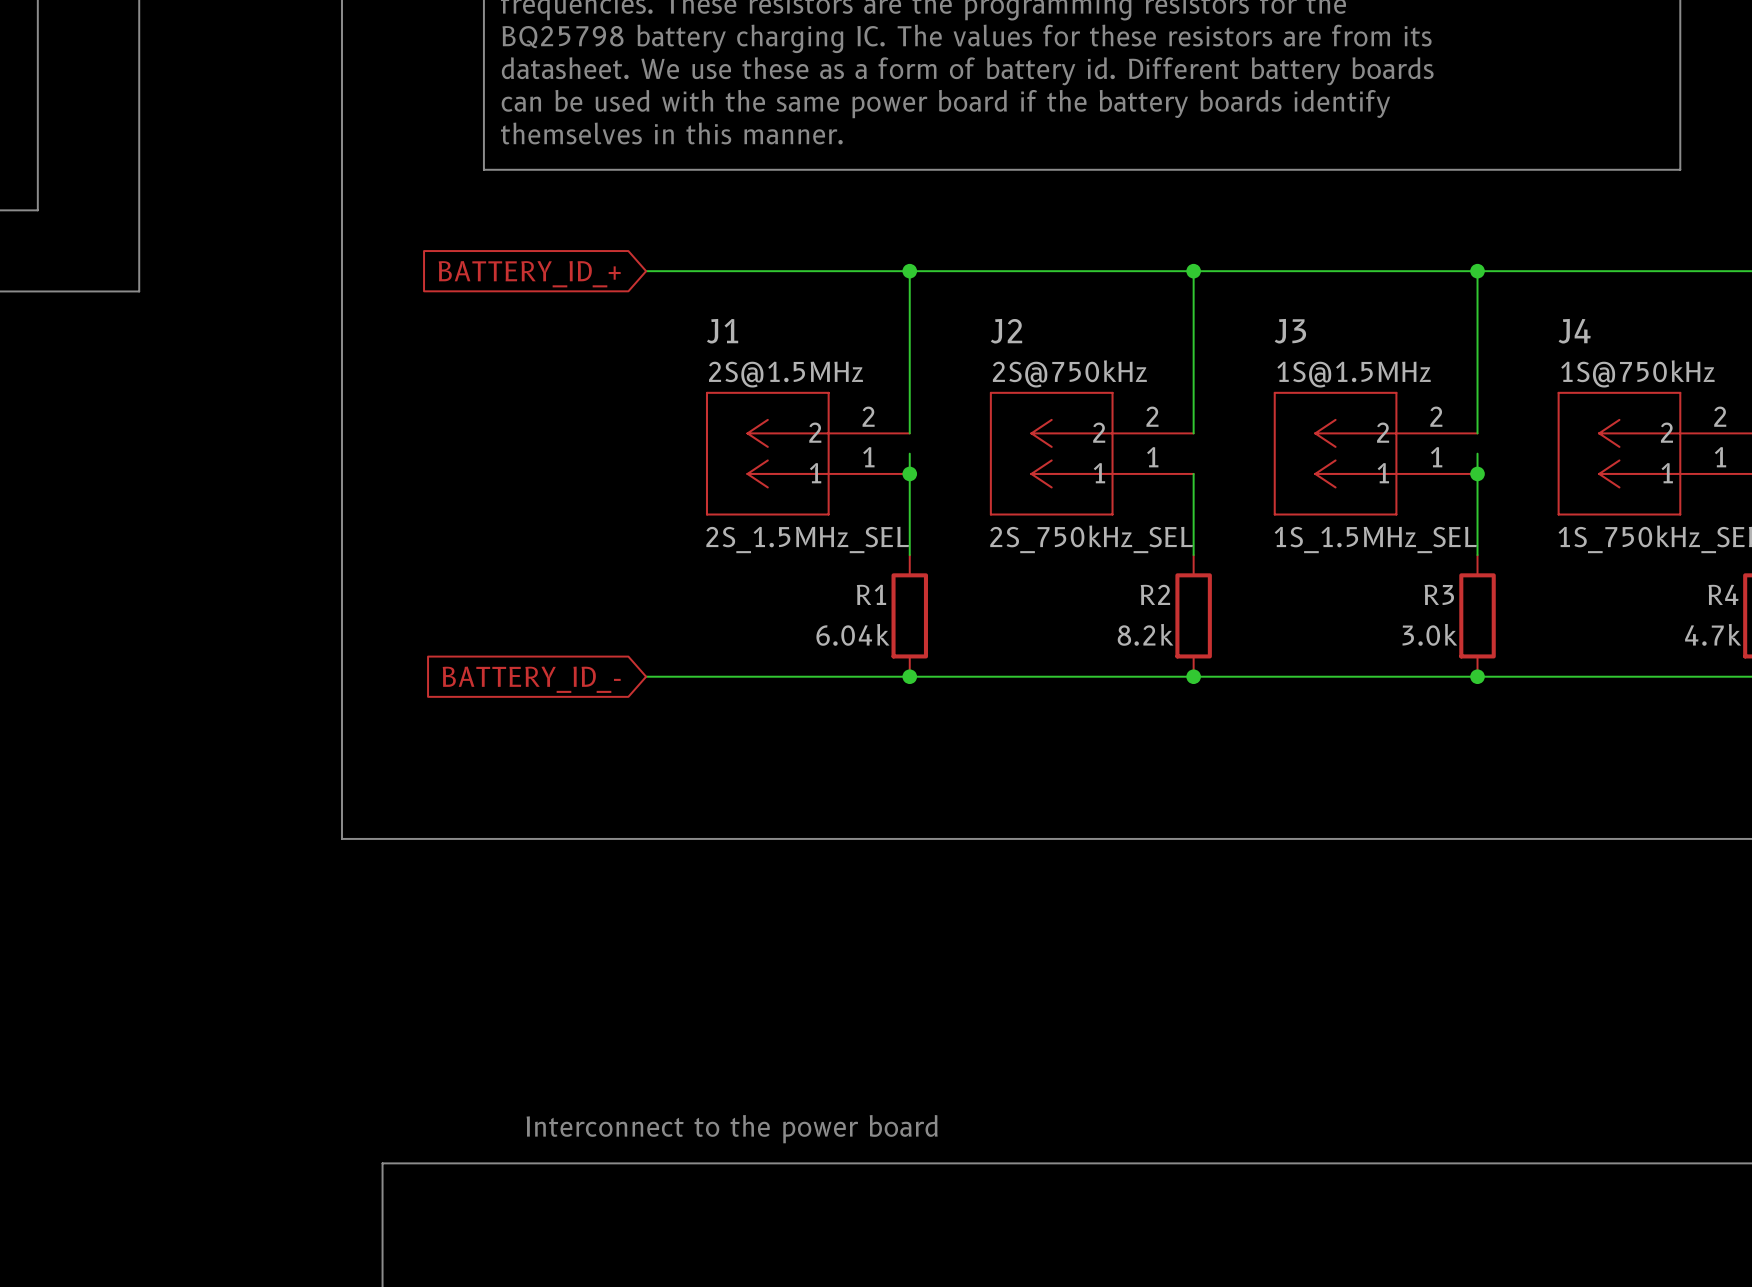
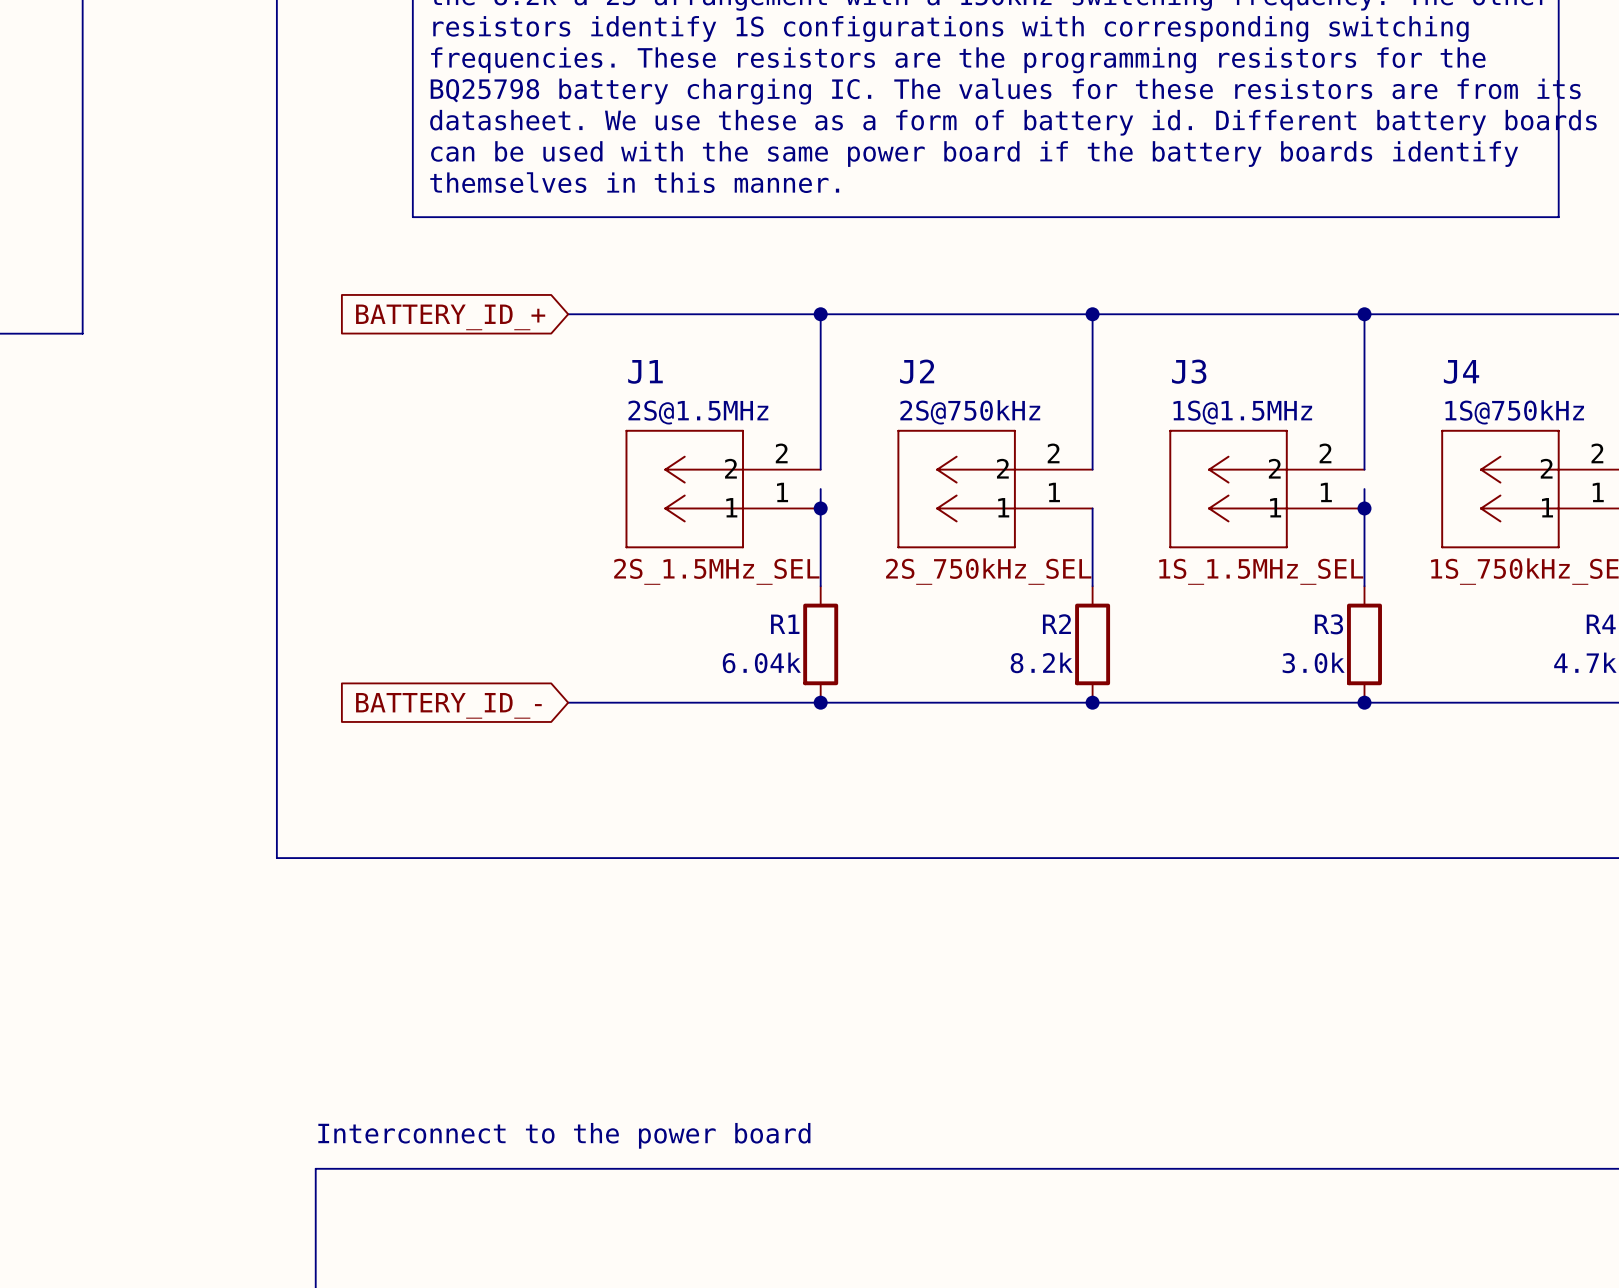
text position: Interconnect to the power board (732, 1129) -> Interconnect to the power board (564, 1135)

